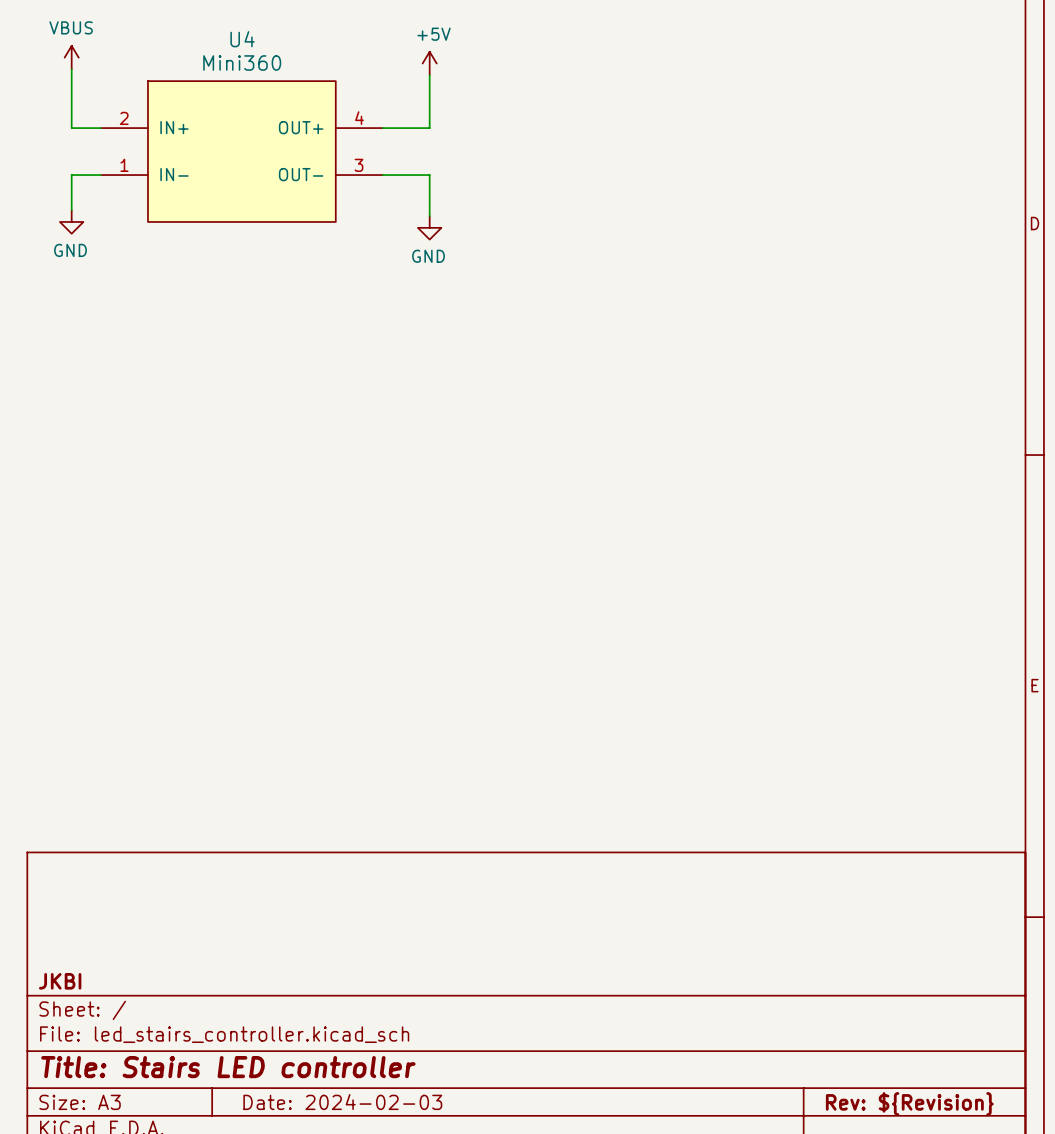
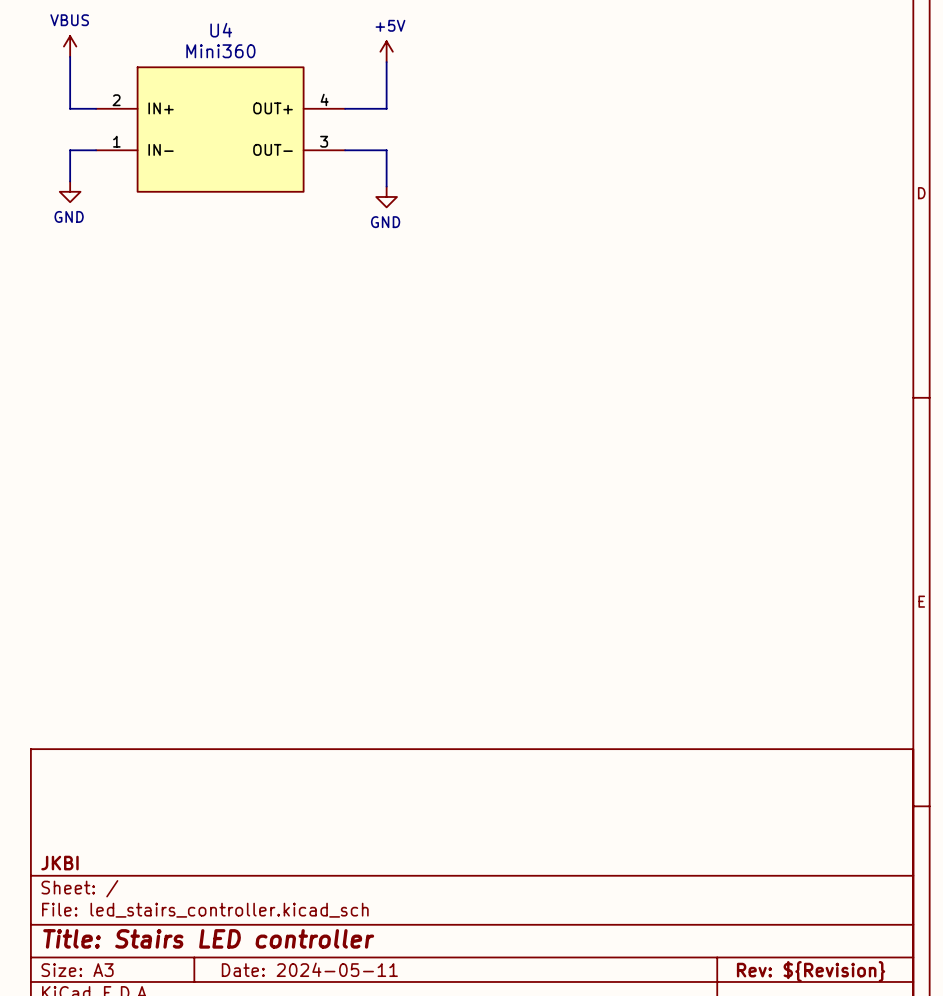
title block: Date: 2024-02-03 (342, 1102) -> Date: 2024-05-11 (309, 969)

